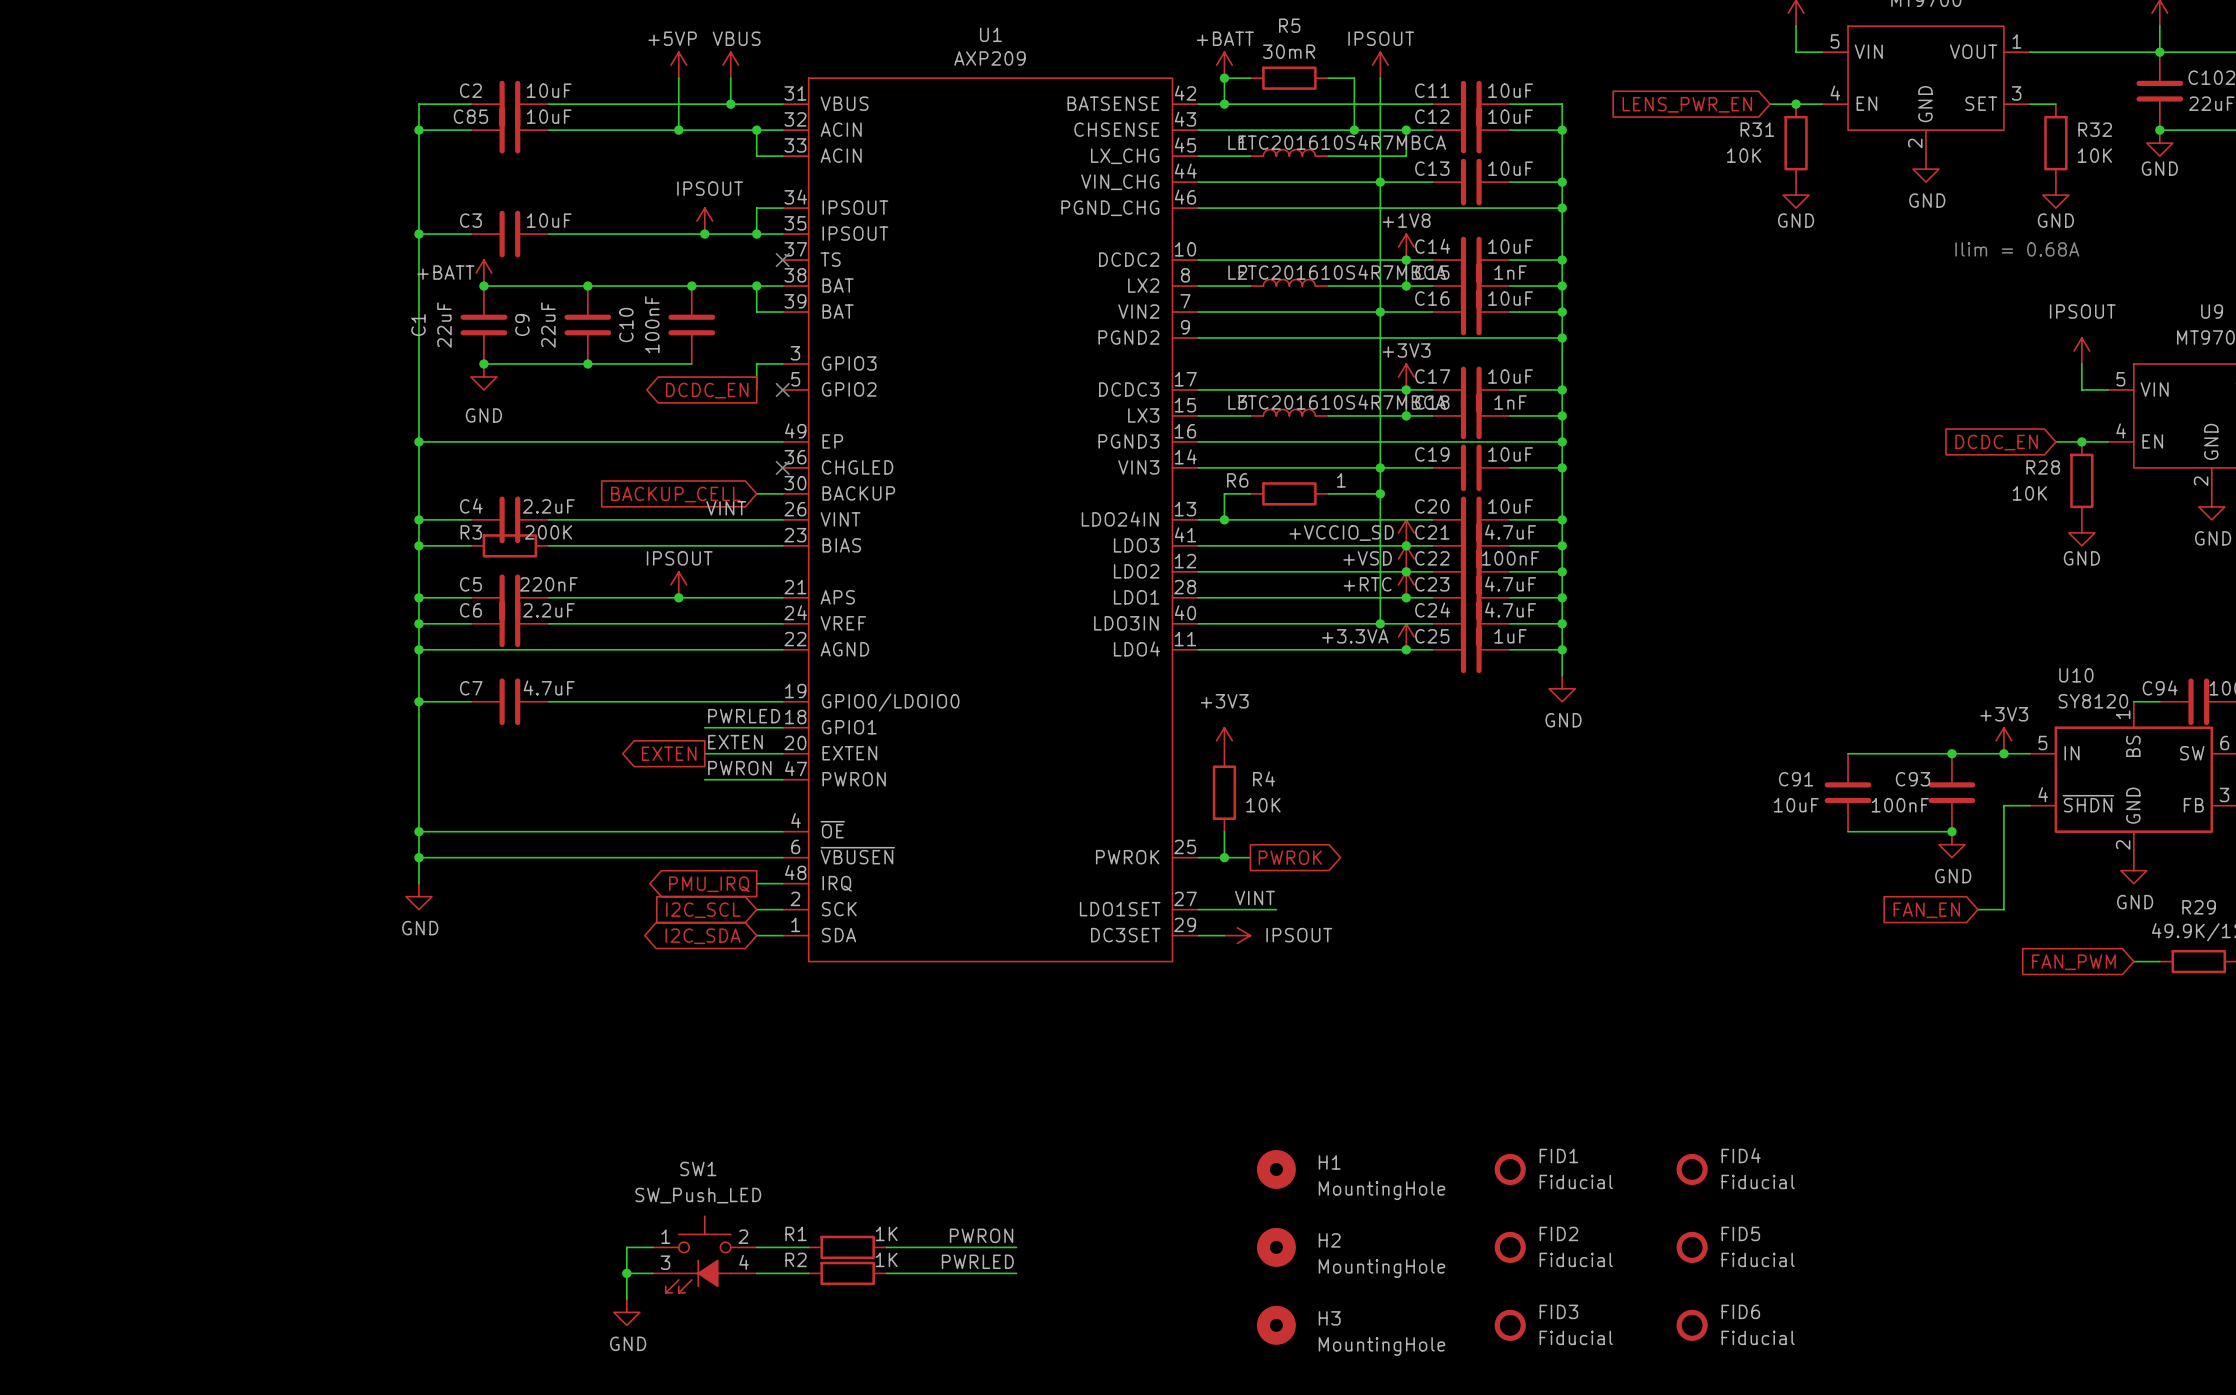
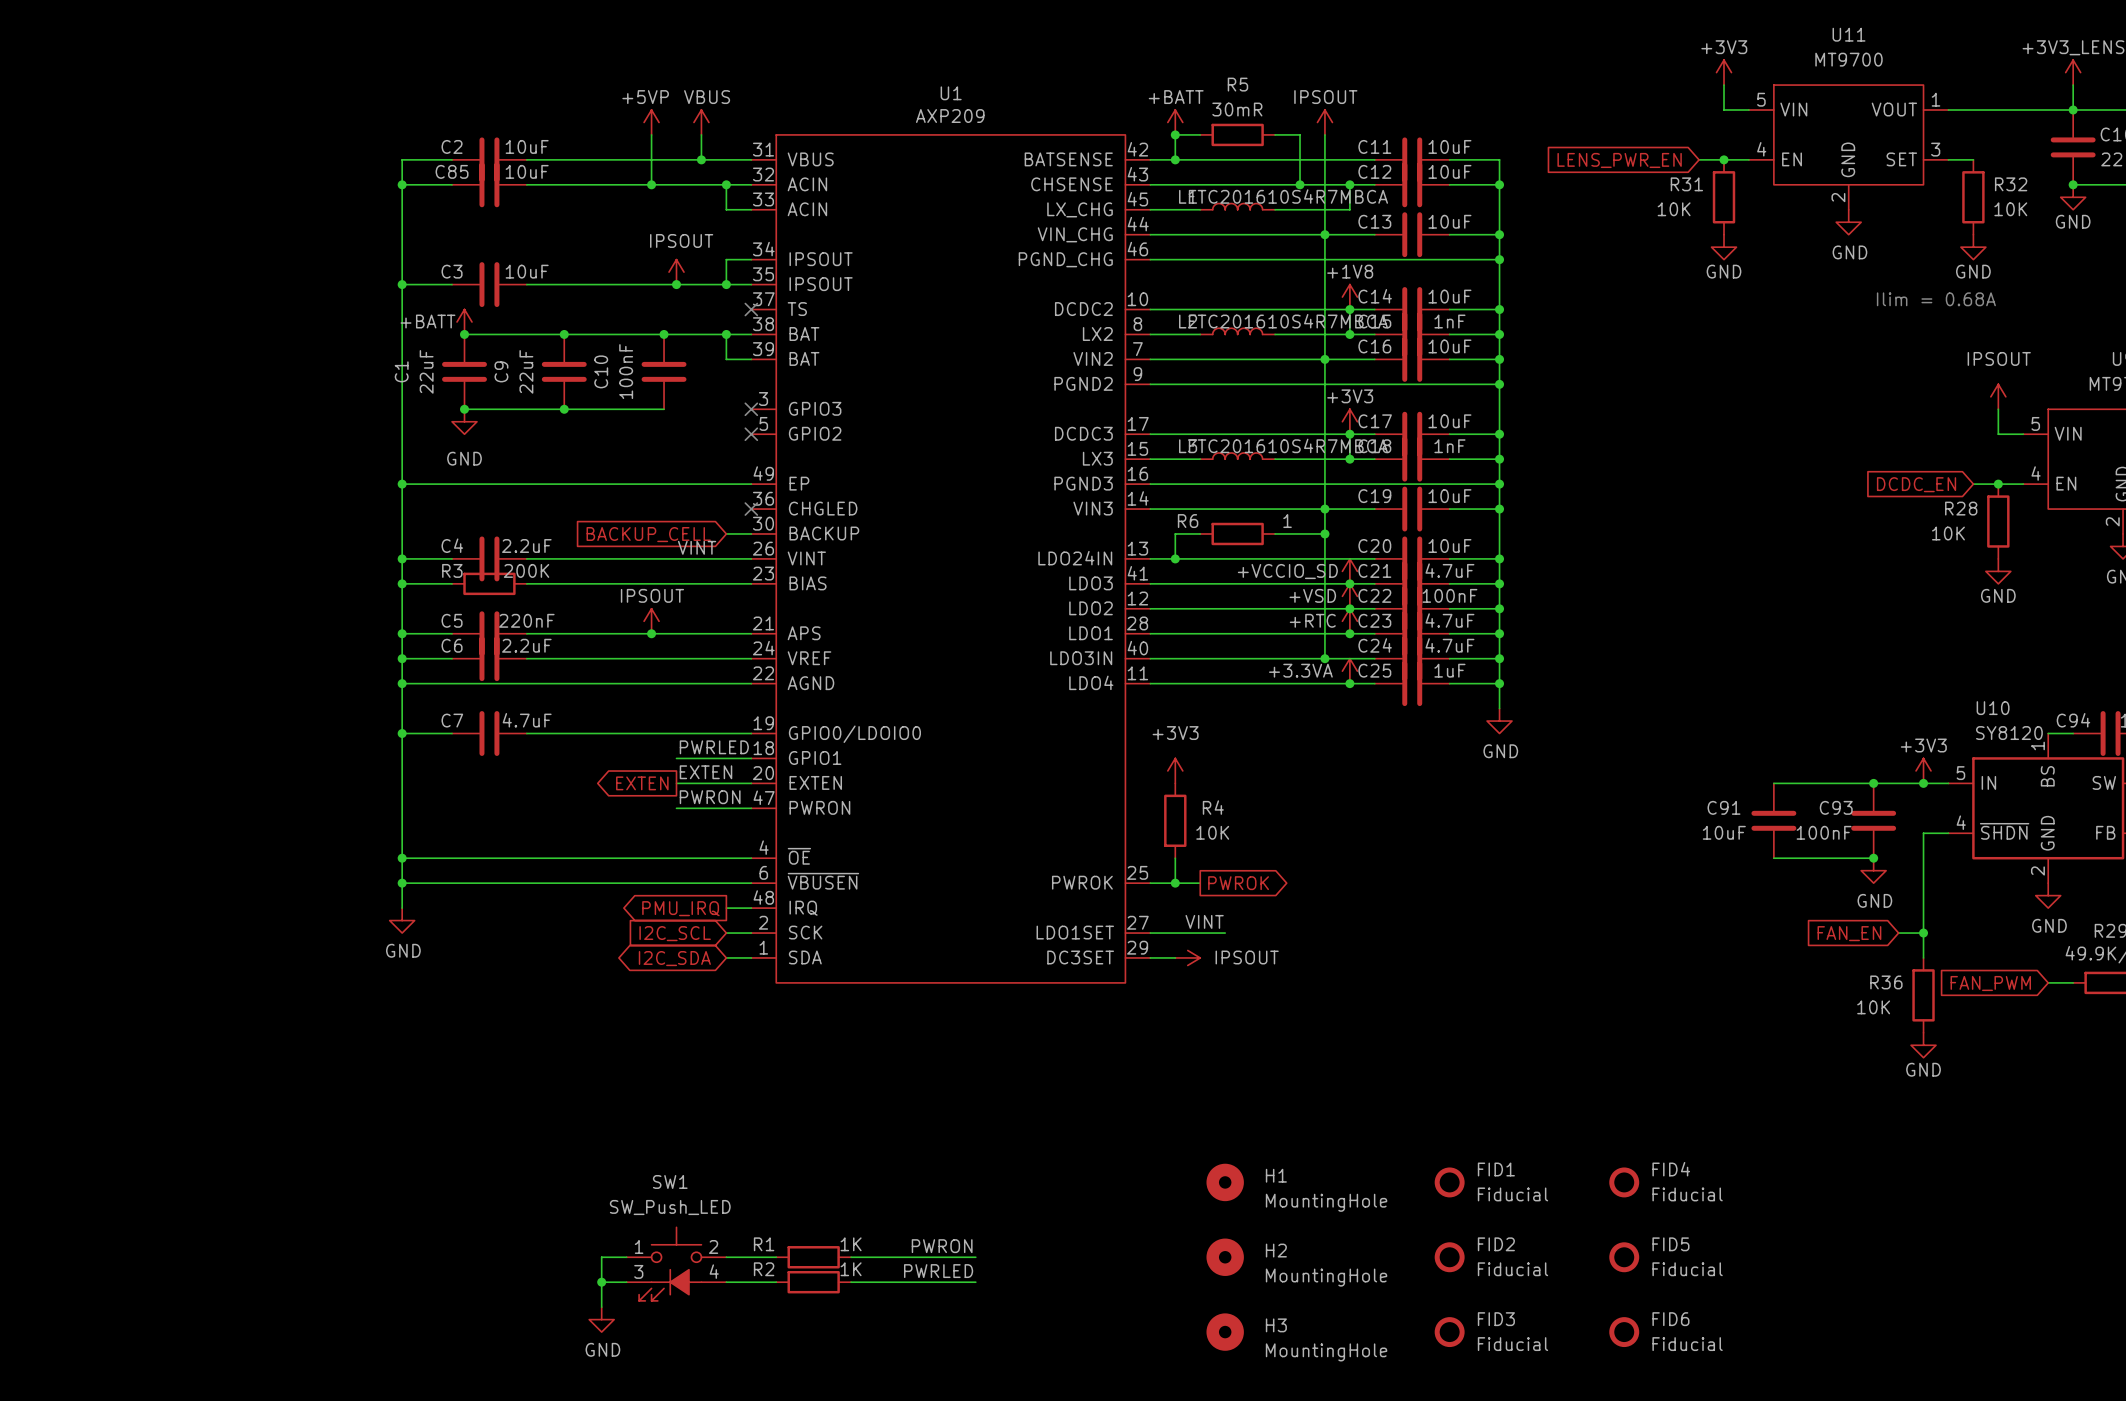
wire: (782, 363) (756, 363) (756, 389) -> none
no-connect mark: none -> (751, 409)
global label: DCDC_EN (707, 390) -> none
wire: none -> (1923, 933) (1923, 957)
junction: none -> (1923, 933)
R36: none -> 10K (1923, 995)
power symbol: none -> GND (1923, 1045)

